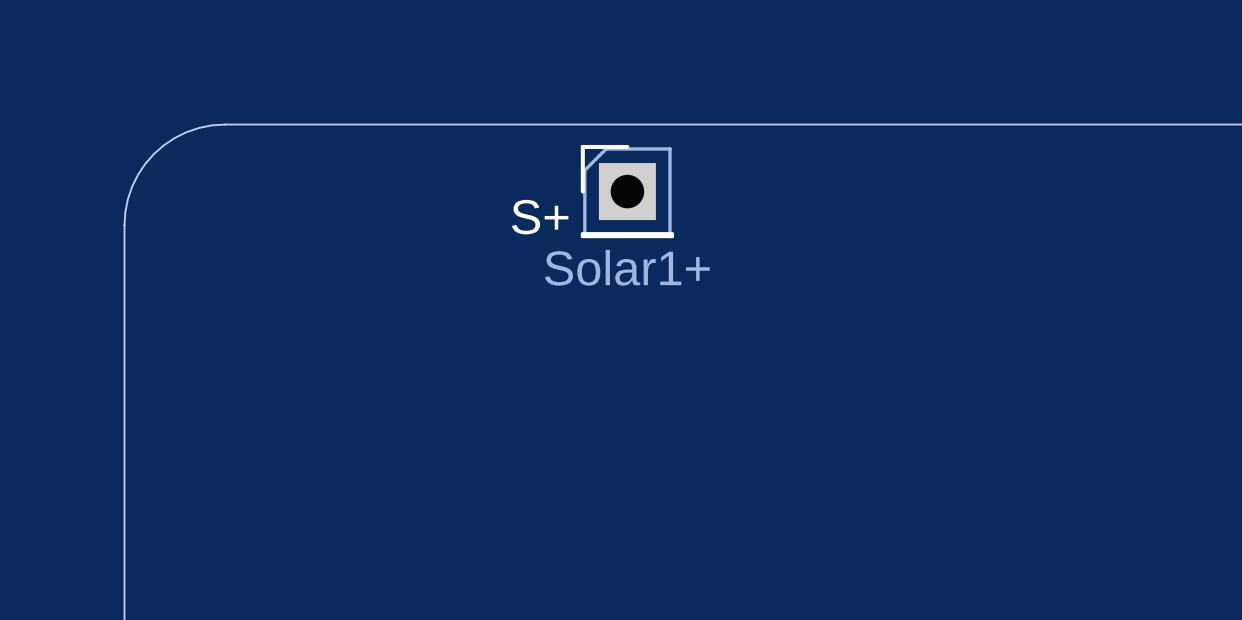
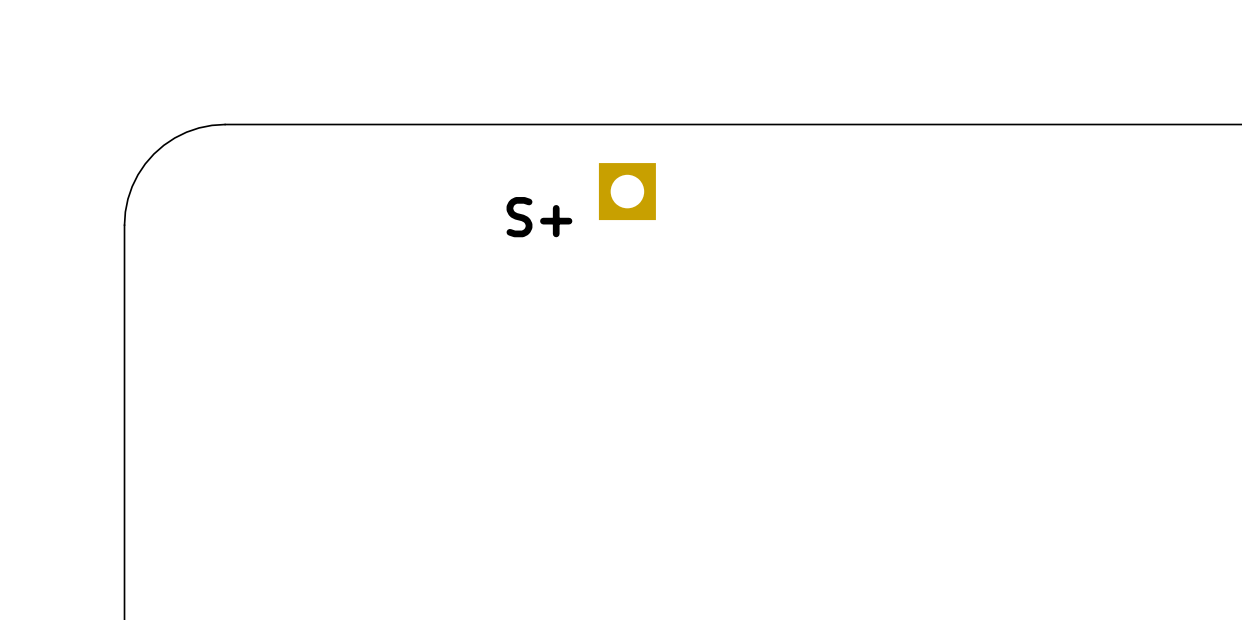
part side: bottom (627, 191) -> top (627, 191)

